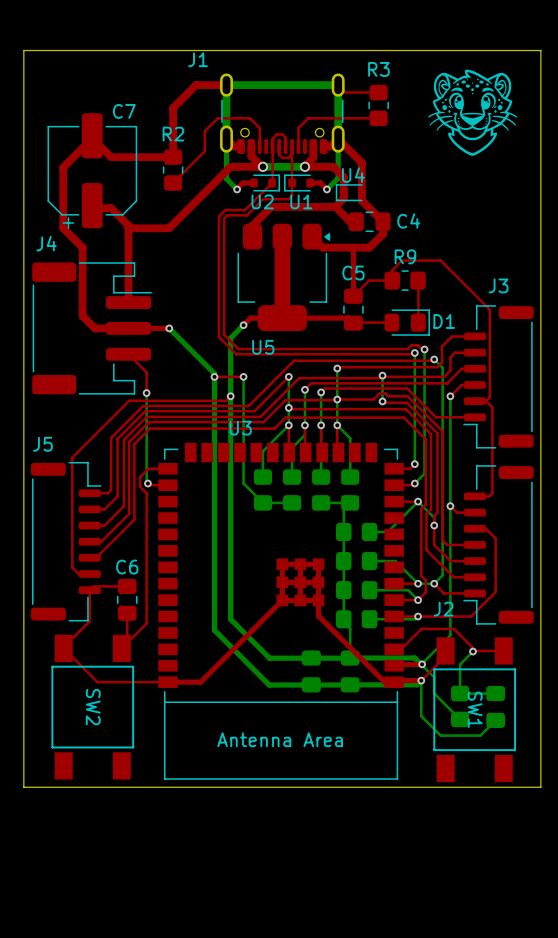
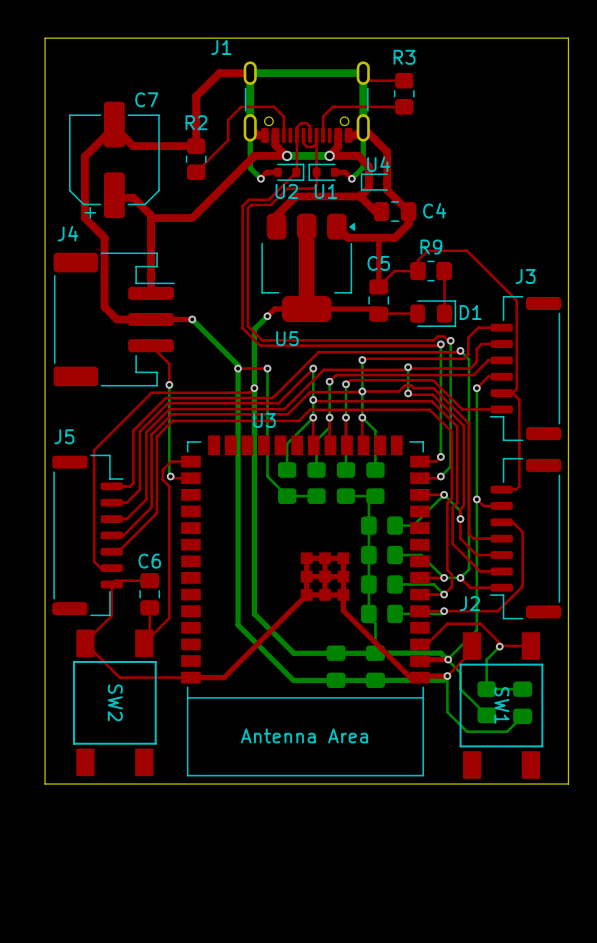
drawing: [428, 69, 518, 156] -> none

